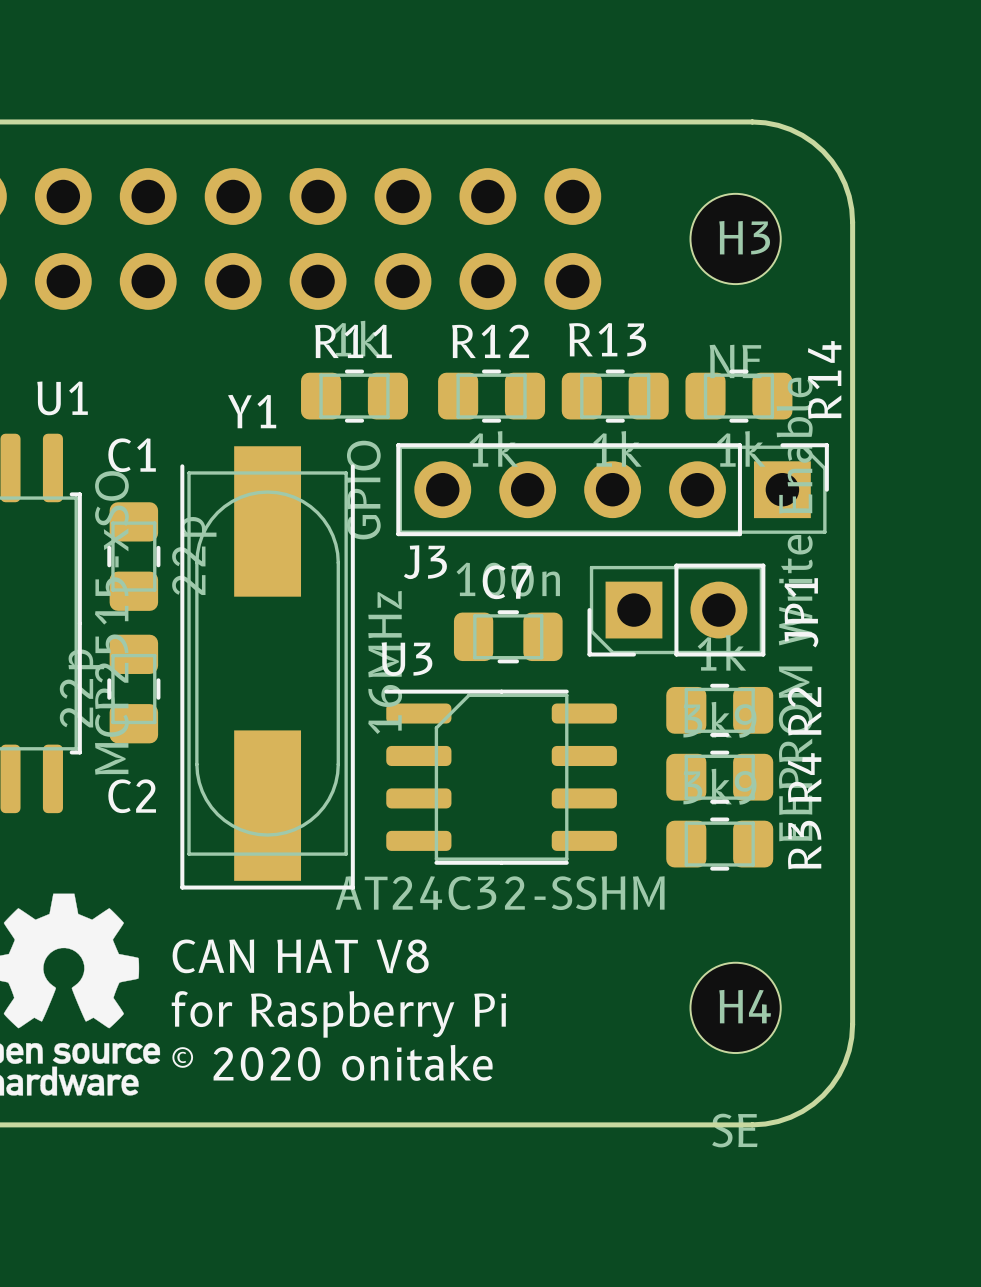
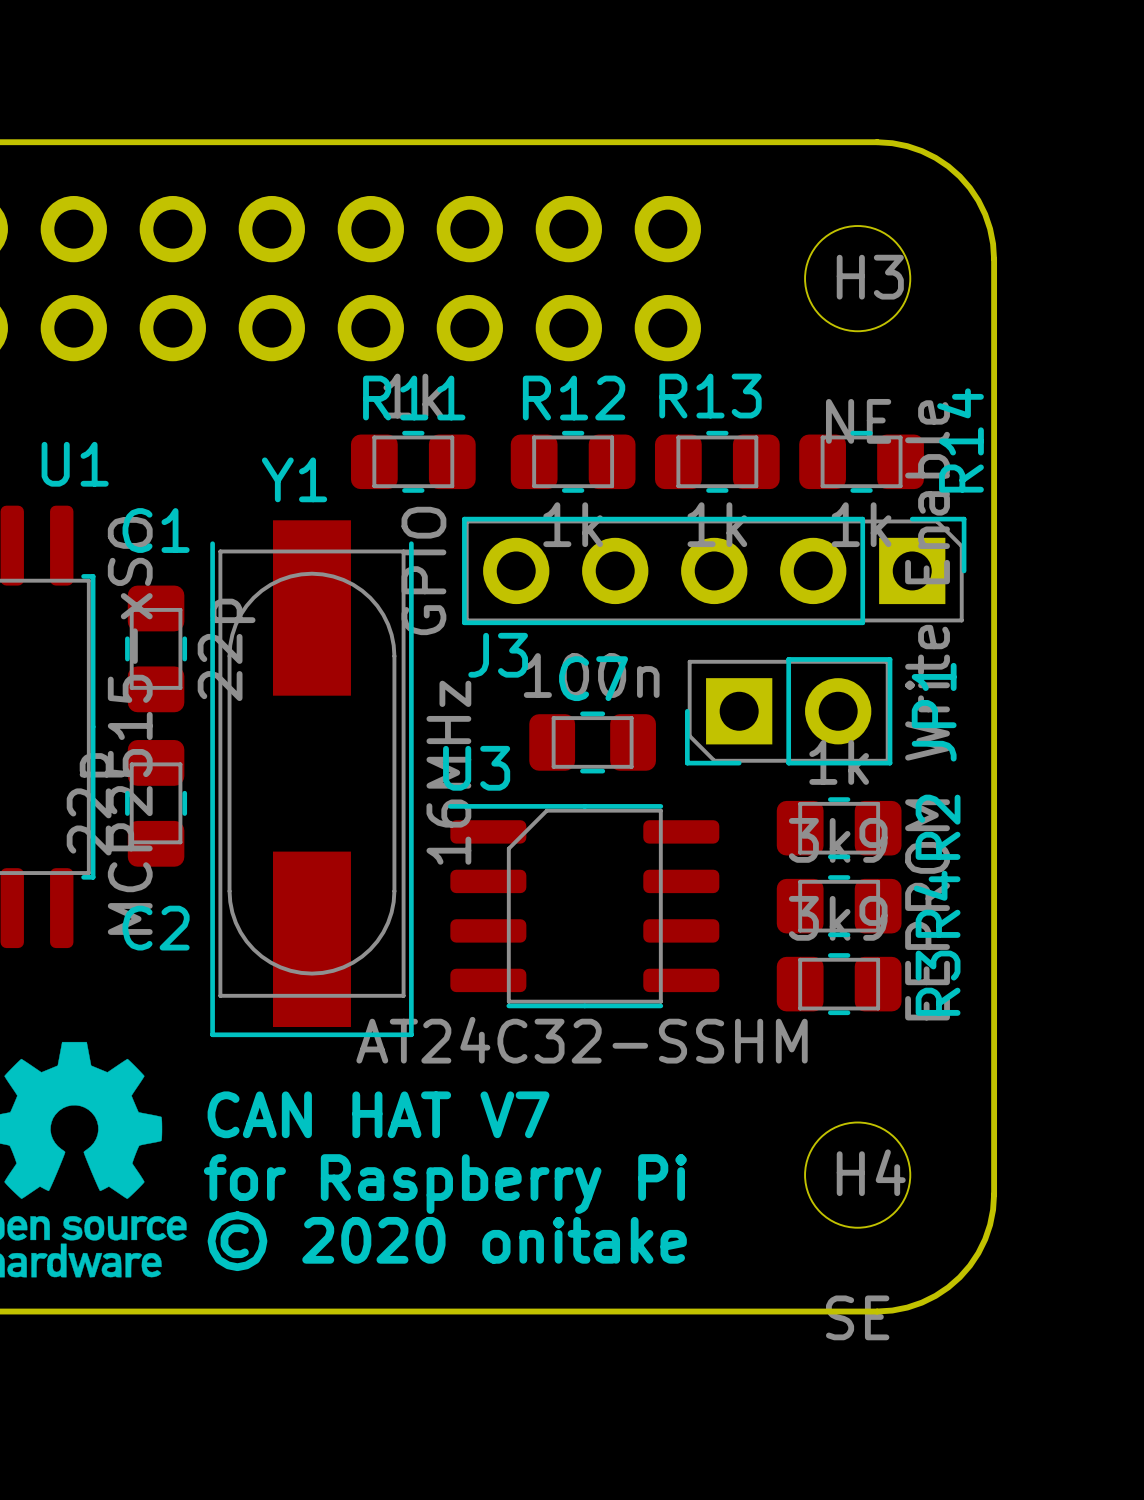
text: CAN HAT V8 (300, 956) -> CAN HAT V7 (378, 1114)

